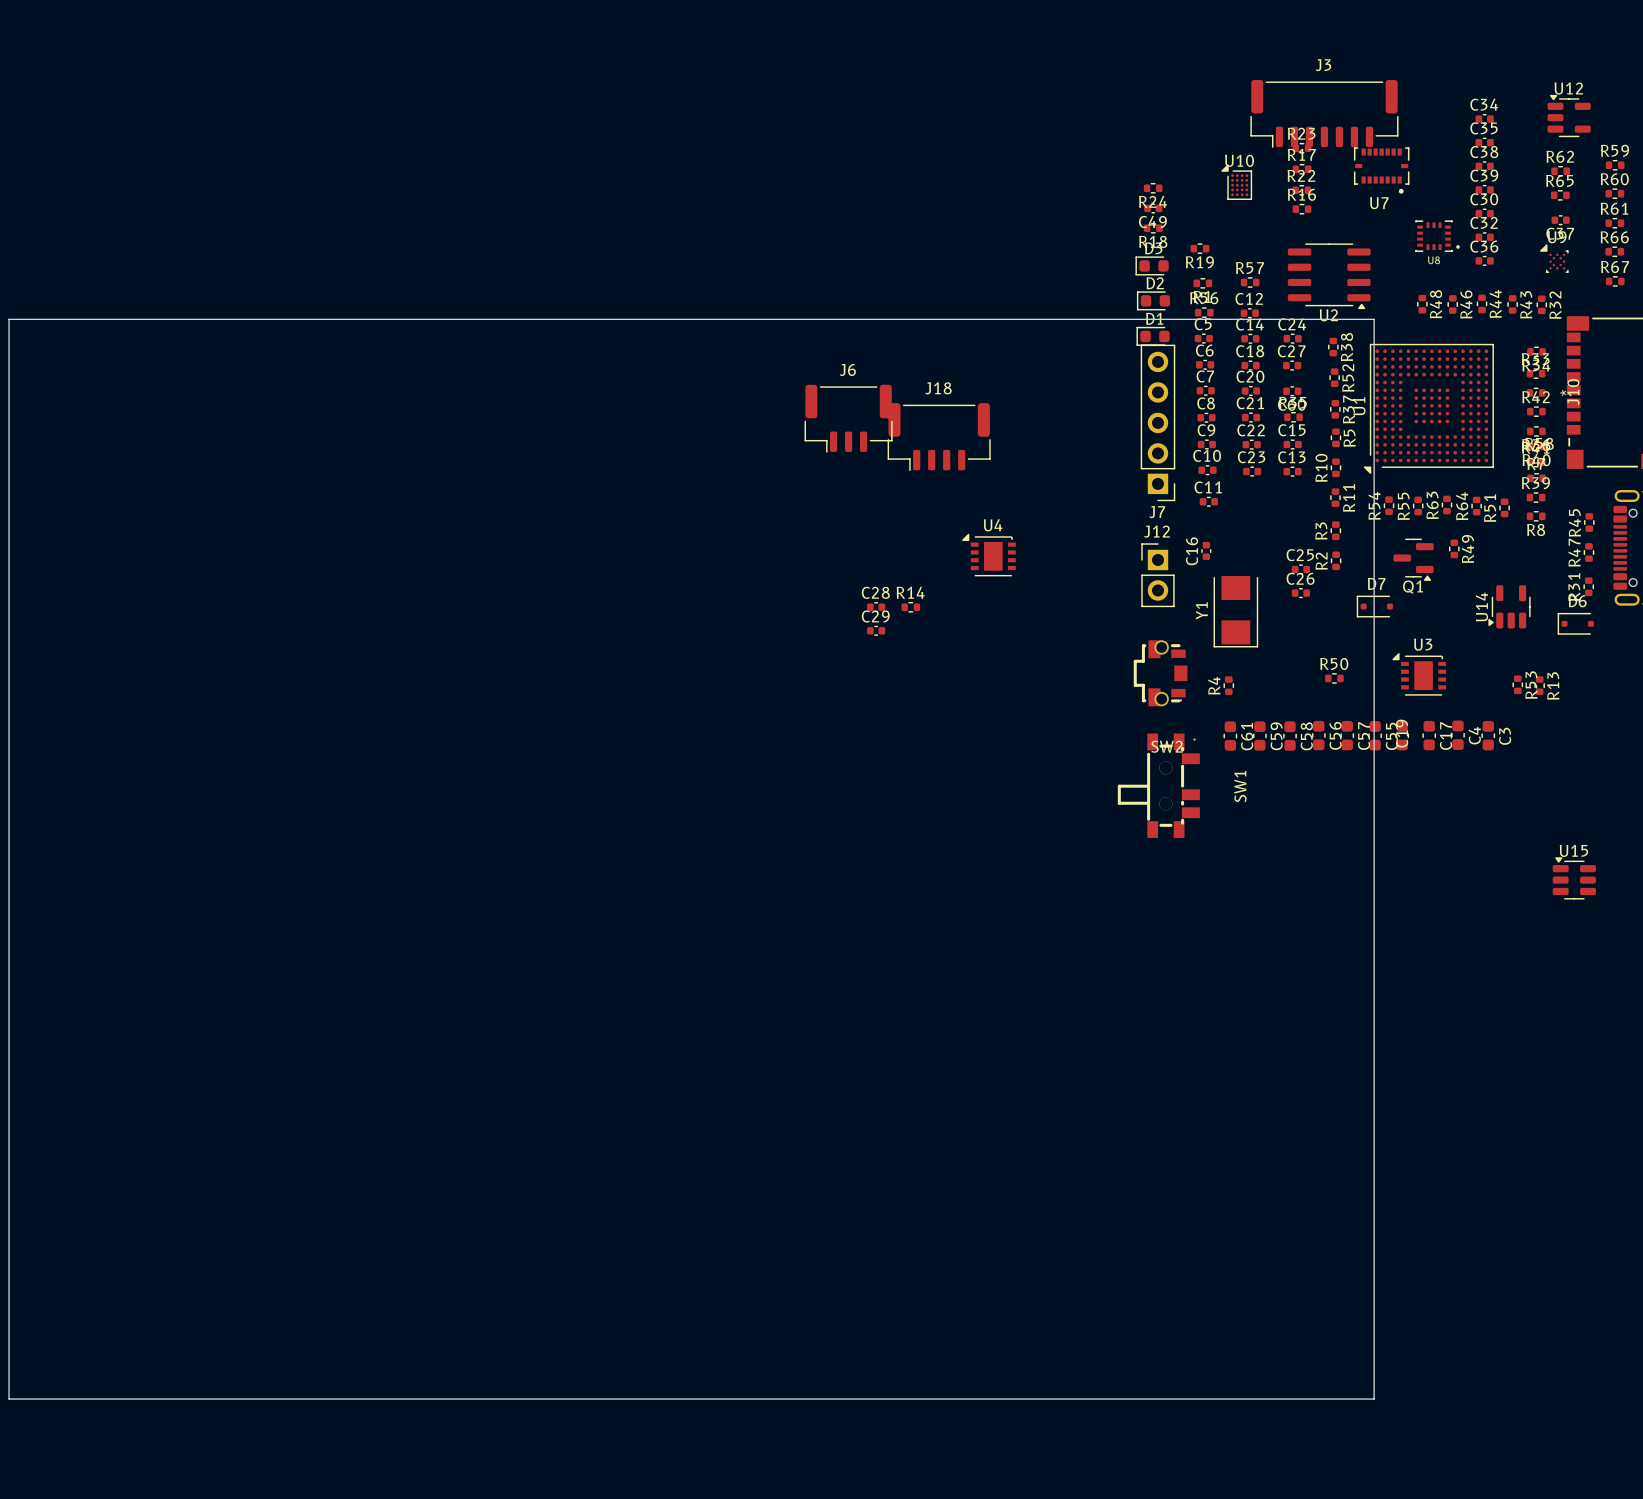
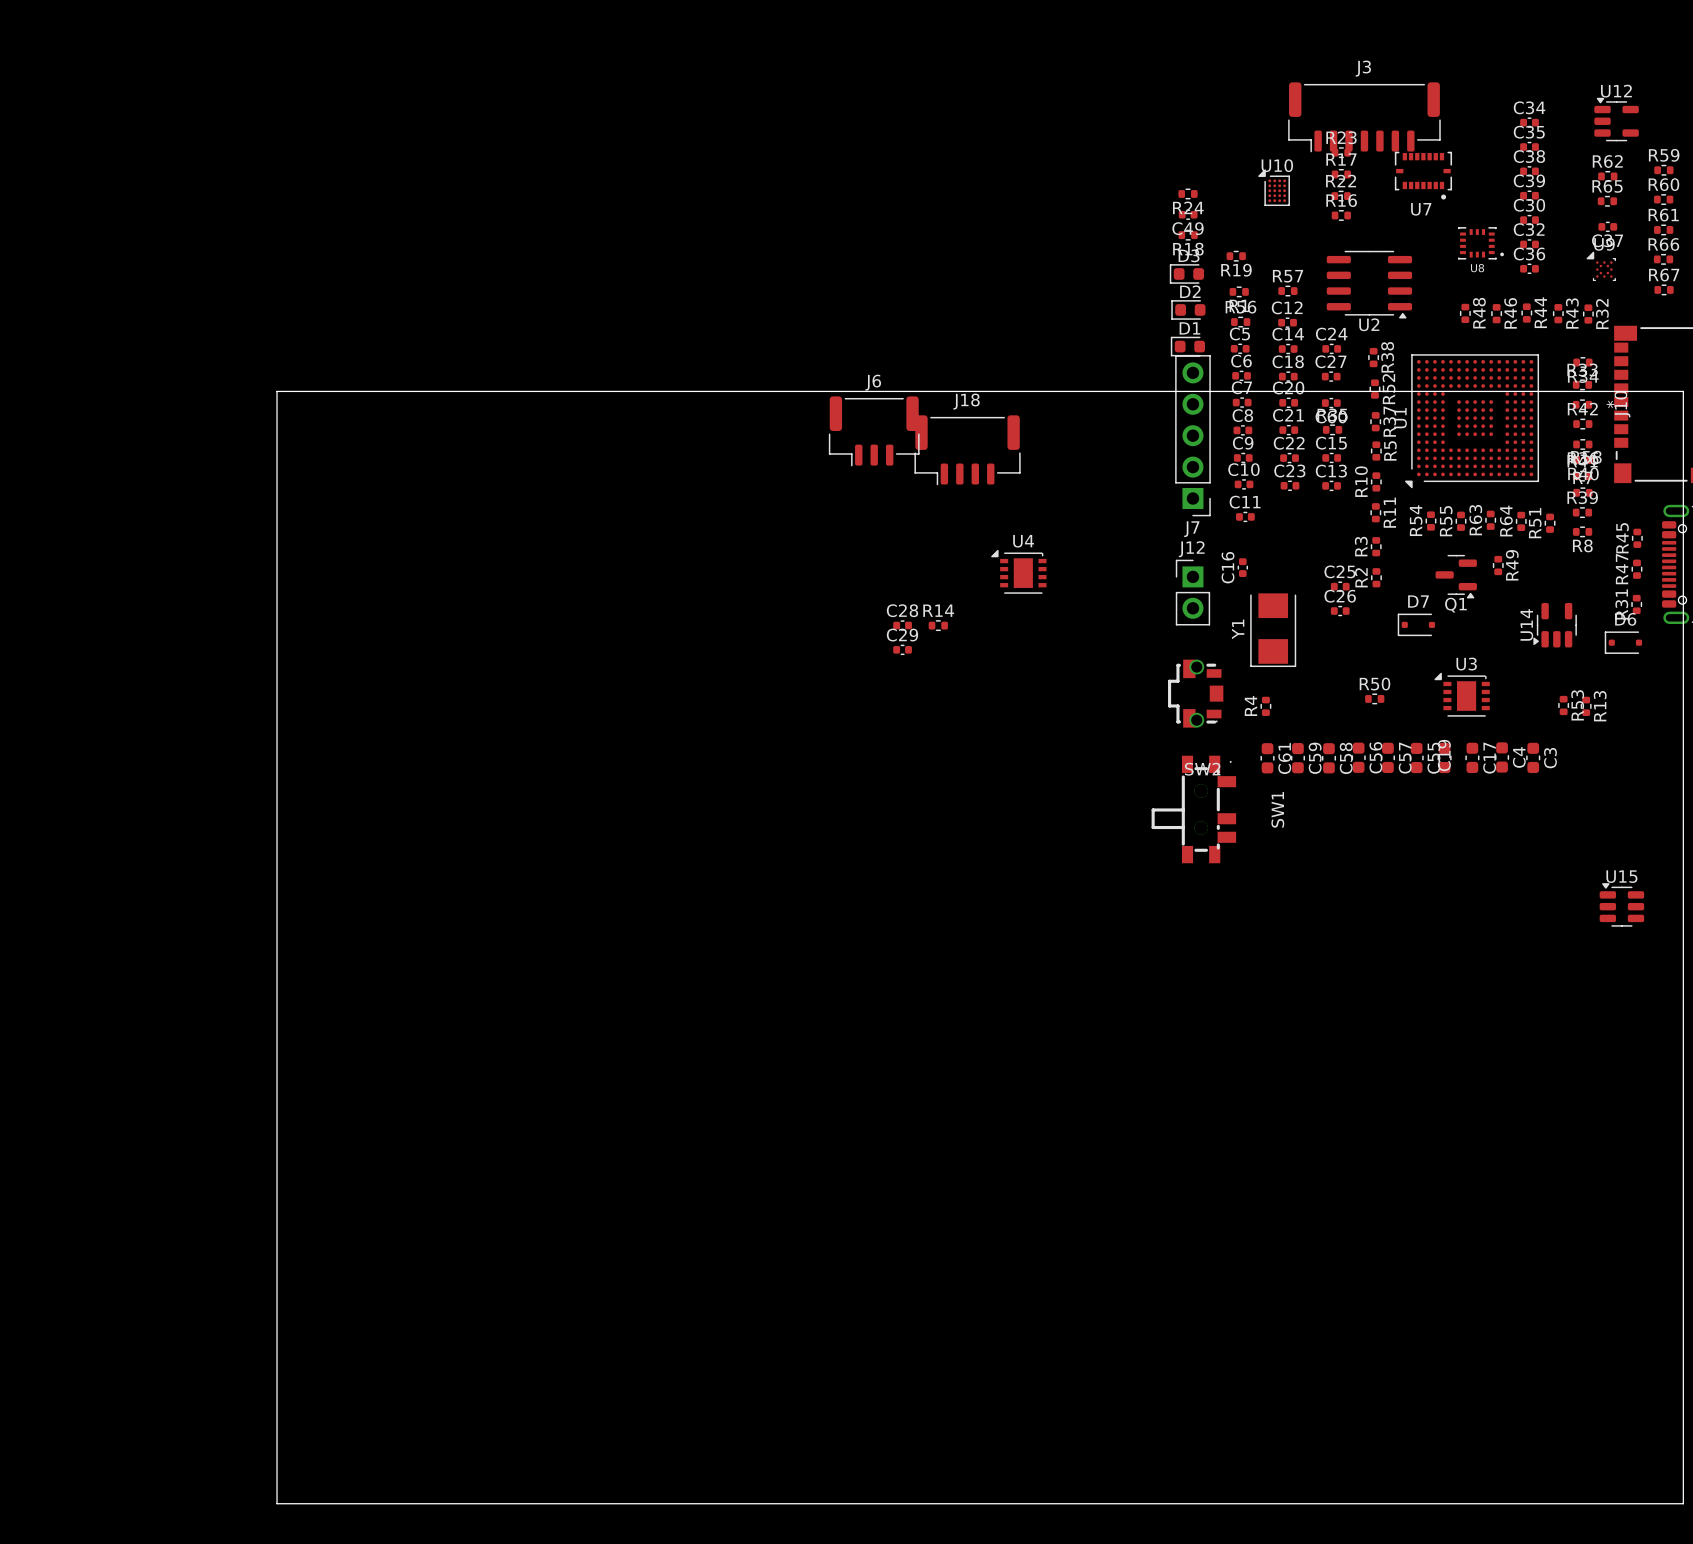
board edge: (9, 319) (1374, 319) (1374, 1399) (9, 1399) (9, 319) -> (277, 391) (1683, 391) (1683, 1503) (277, 1503) (277, 391)

